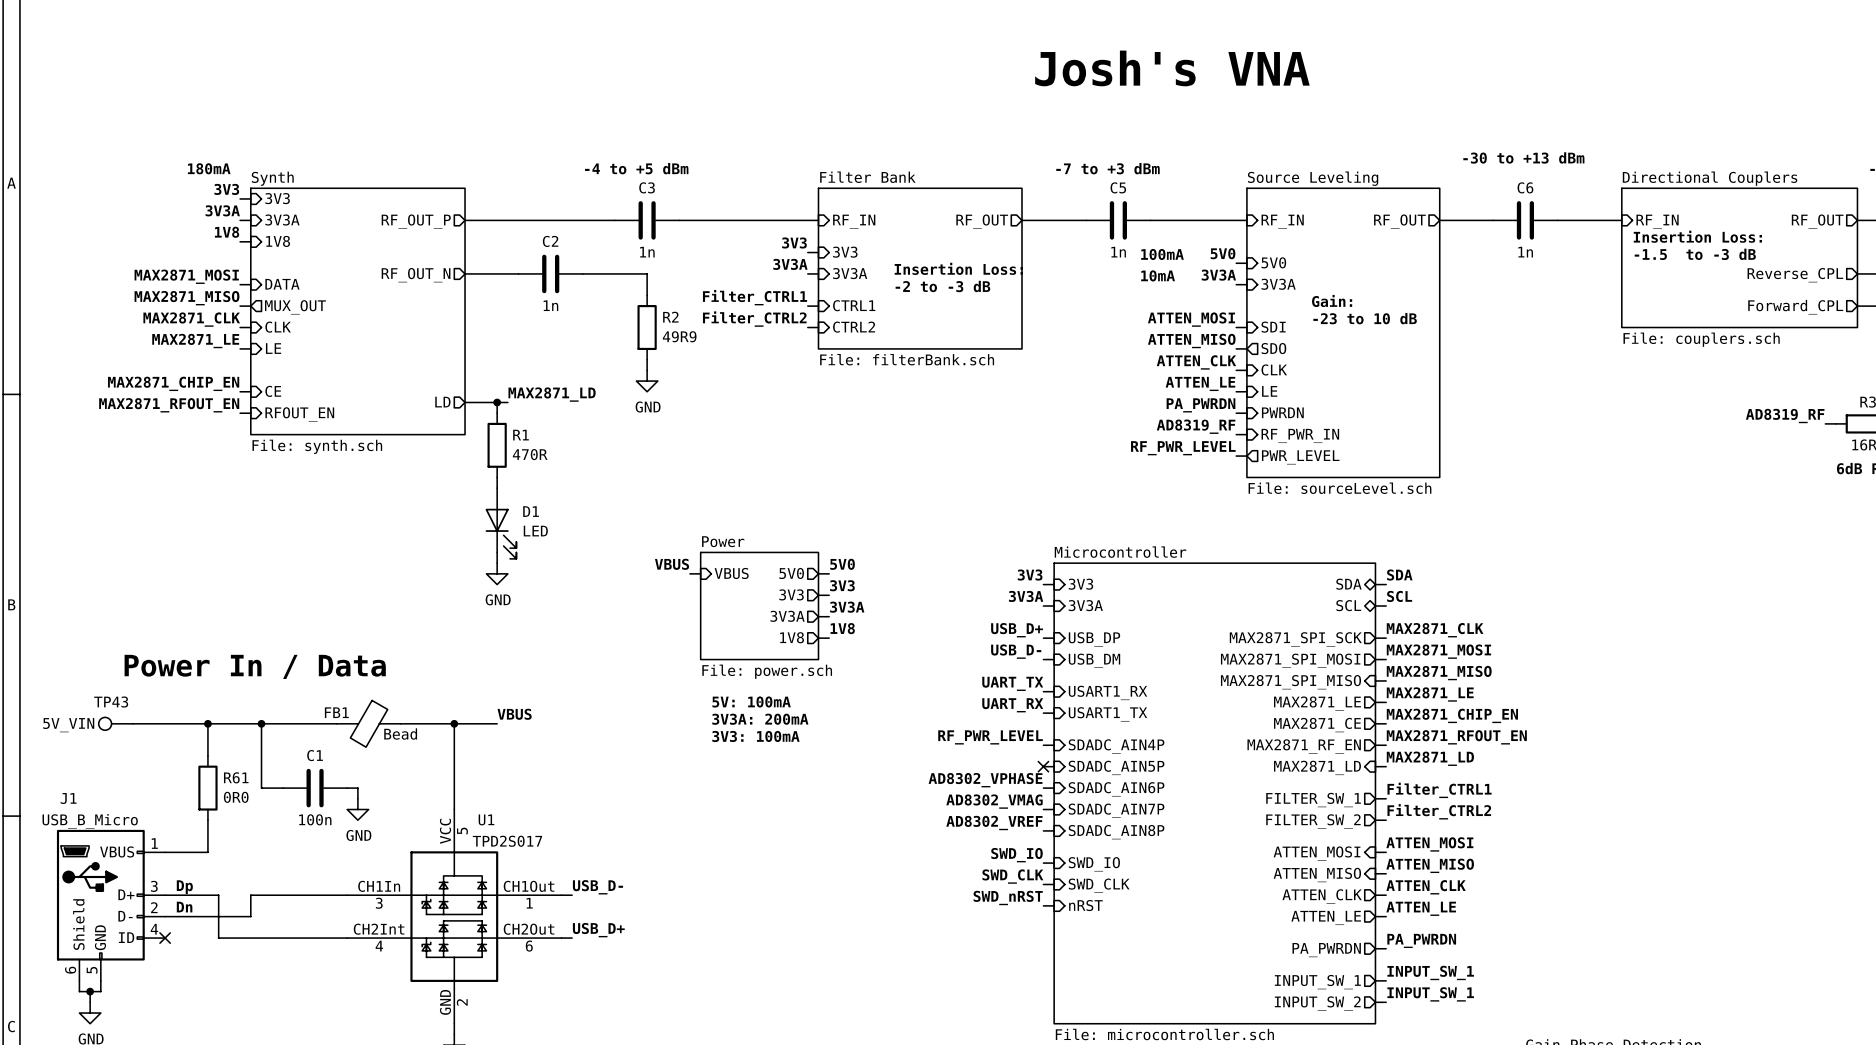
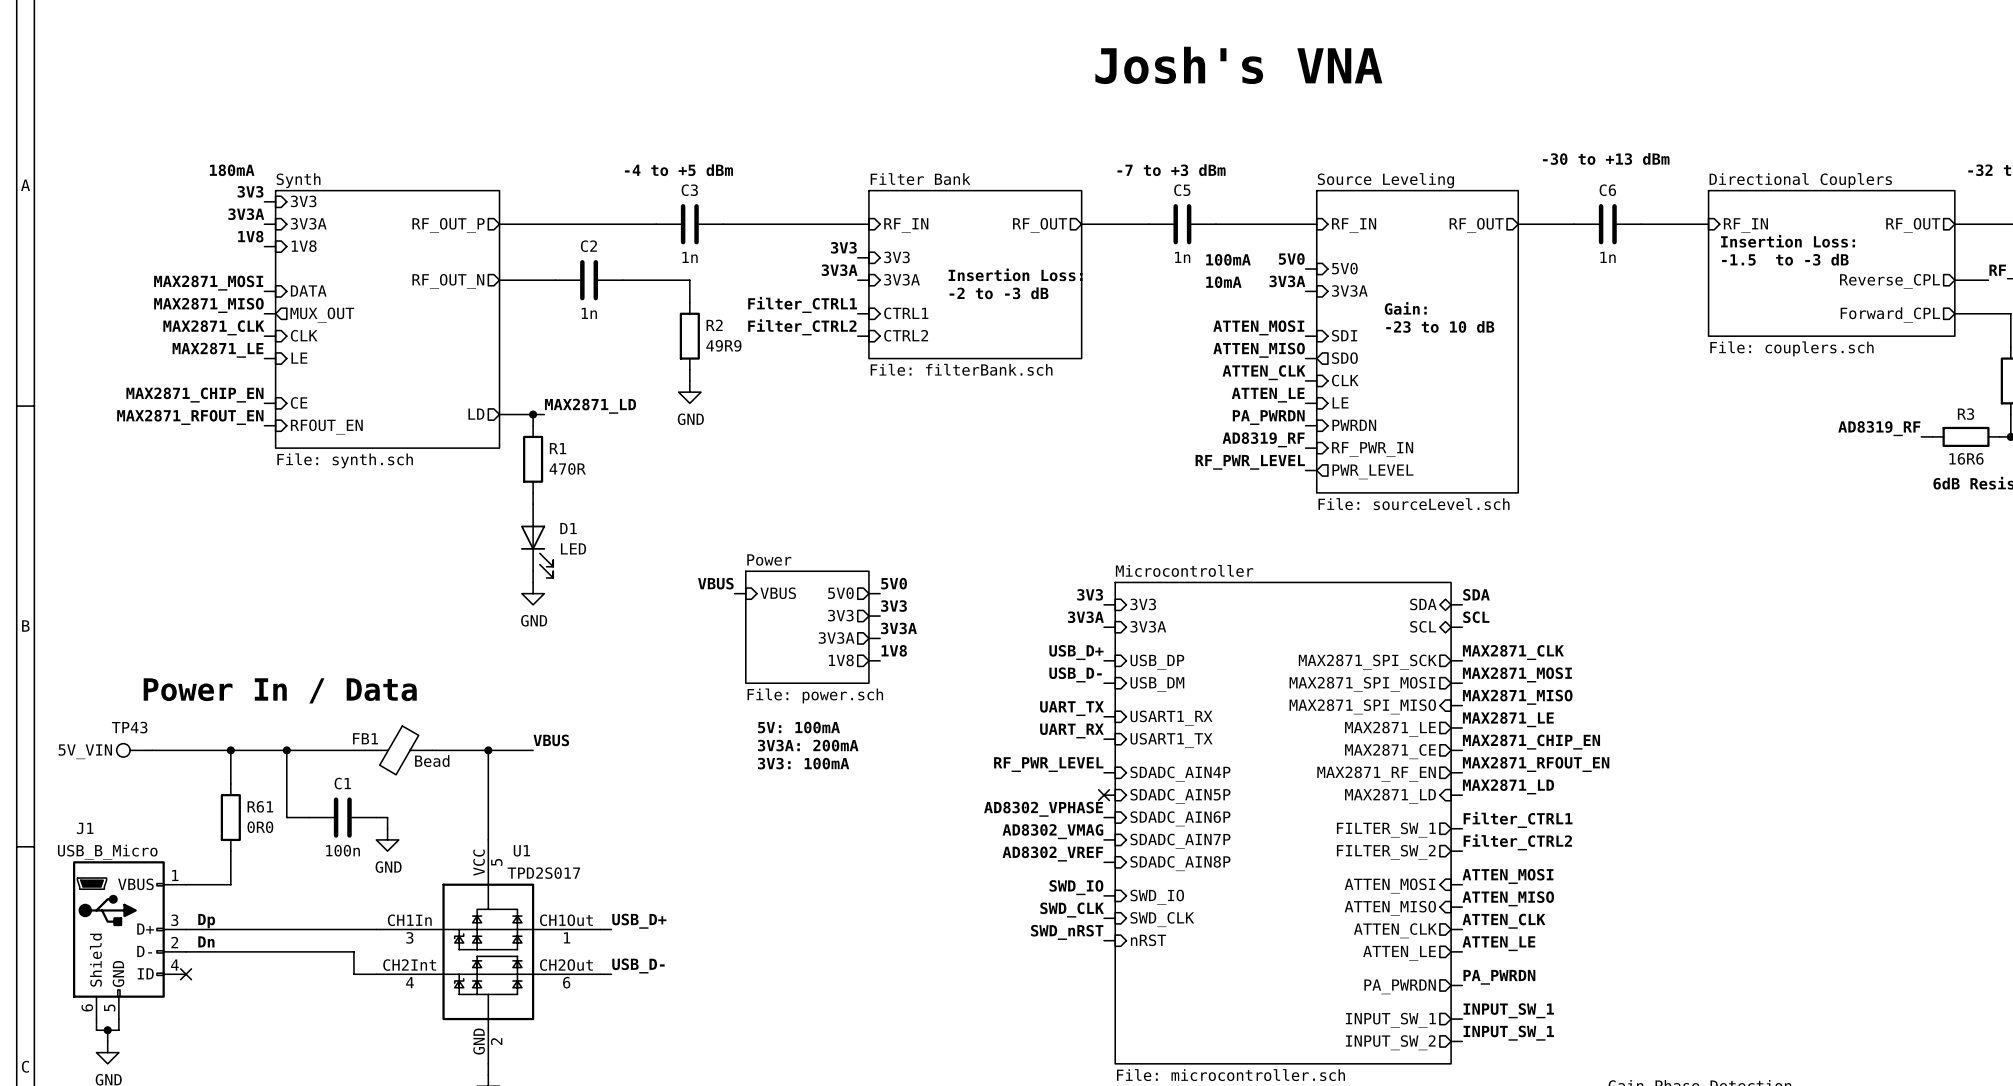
label: USB_D- (597, 887) -> USB_D+ (639, 921)
wire: (218, 895) (218, 938) (325, 938) -> (275, 951) (353, 951) (353, 974)
wire: (250, 895) (250, 916) -> (275, 929) (242, 929)
label: USB_D+ (598, 930) -> USB_D- (638, 966)

